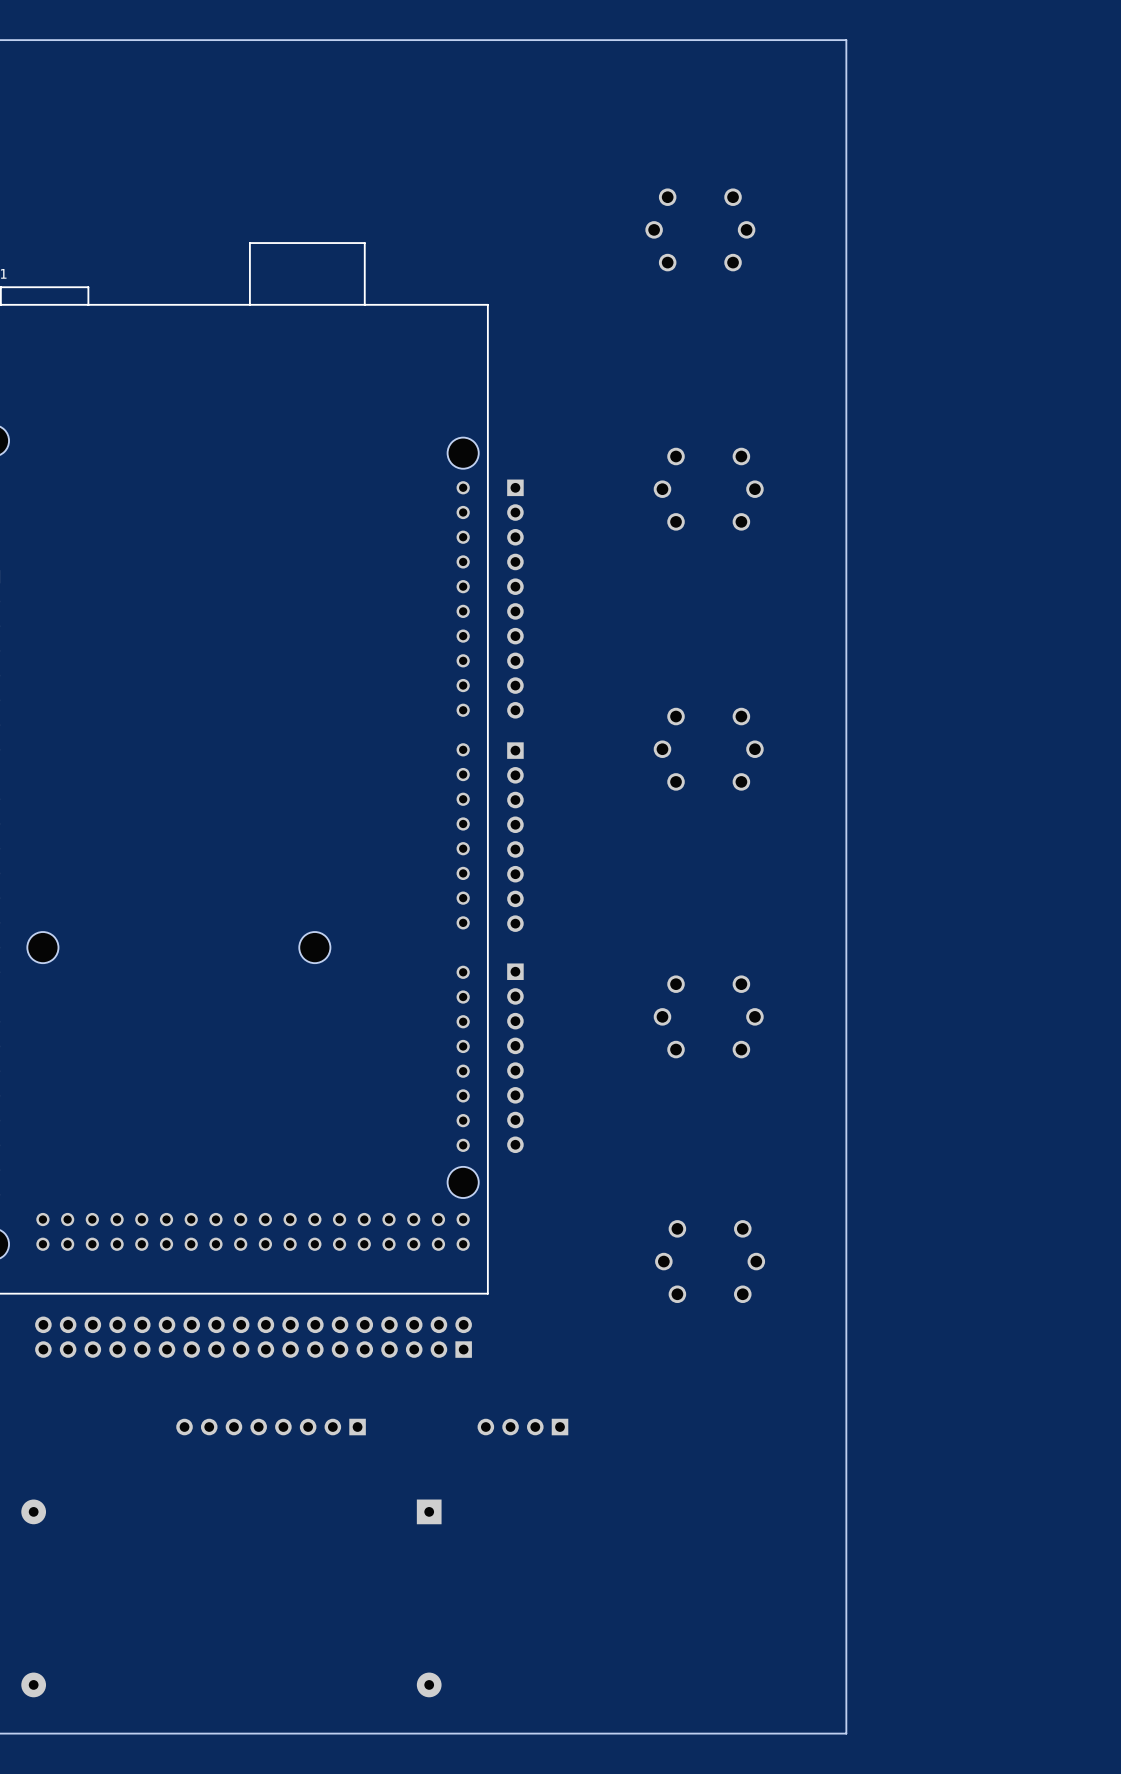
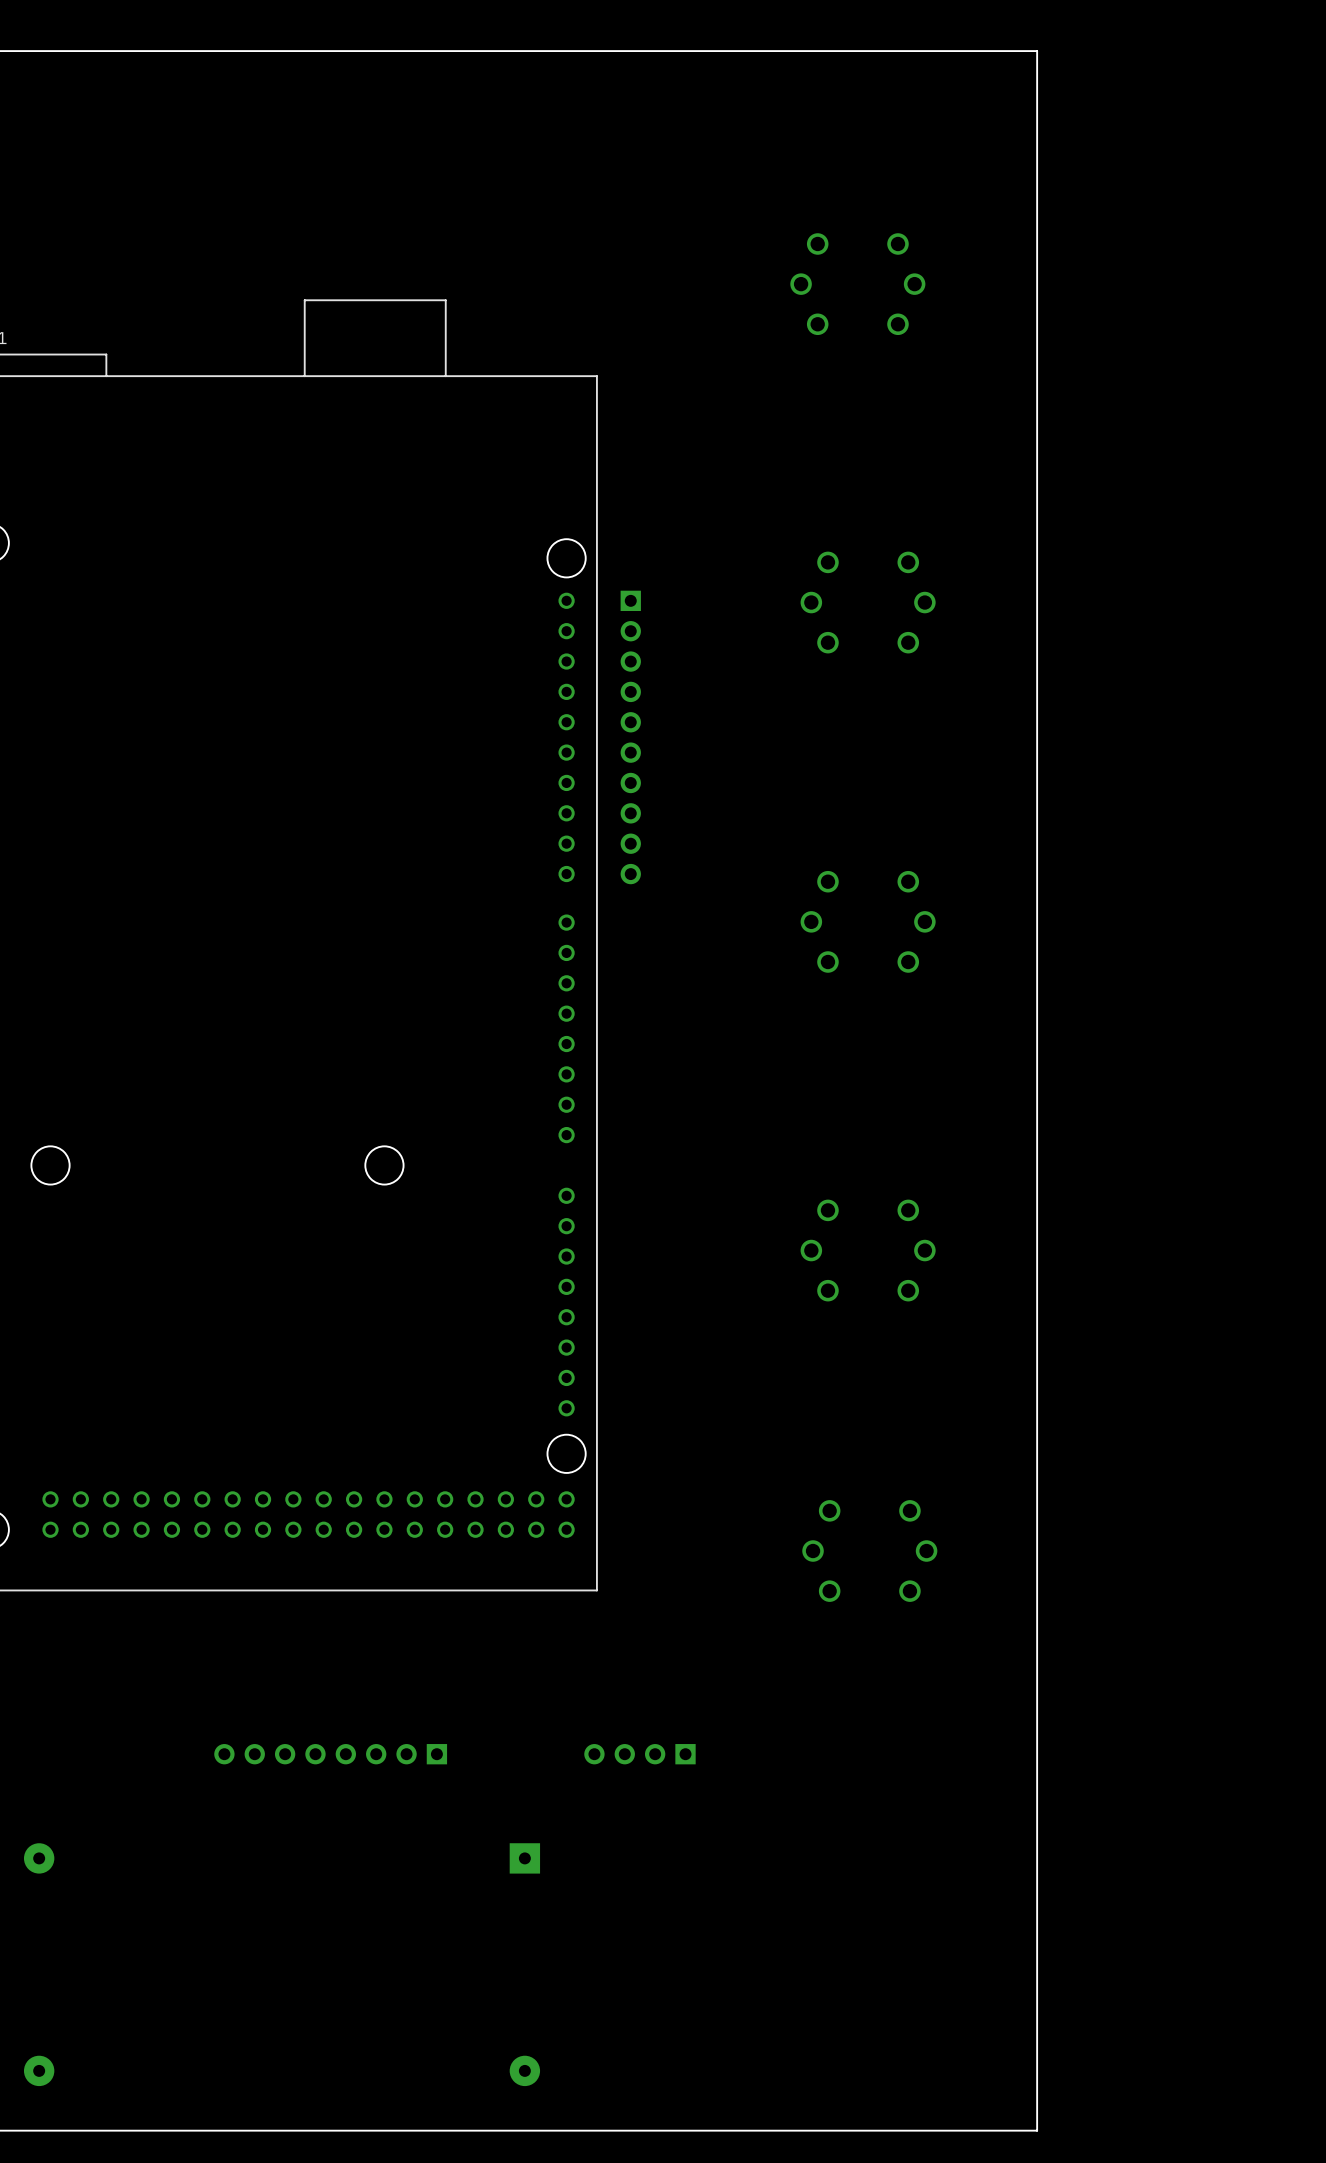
part: (515, 837) -> none
part: (515, 1058) -> none
part: (253, 1337) -> none

